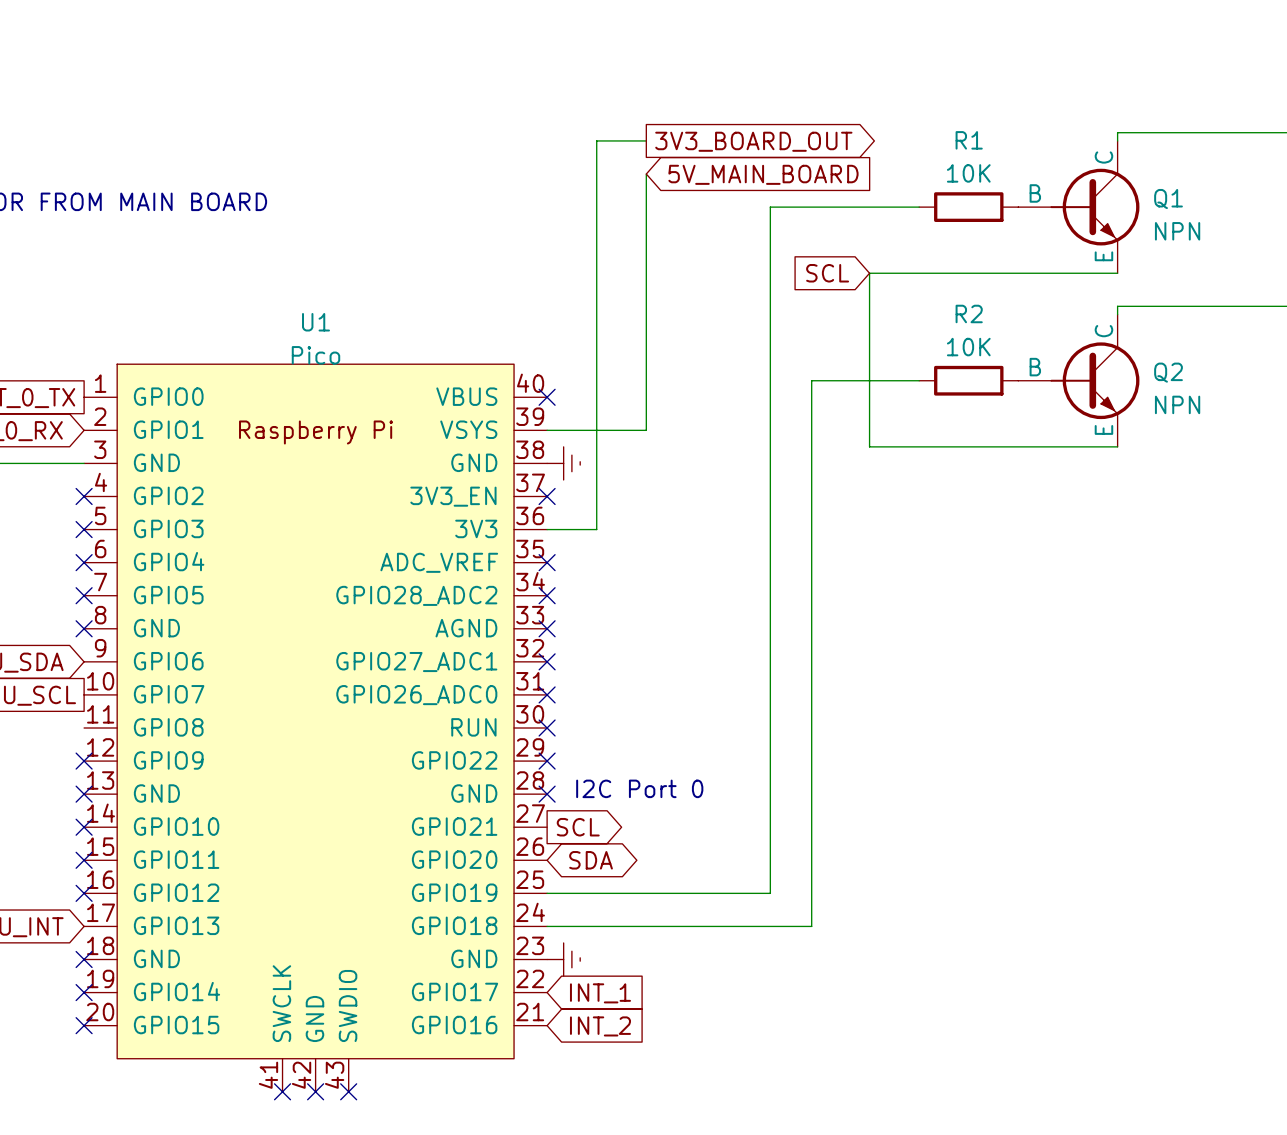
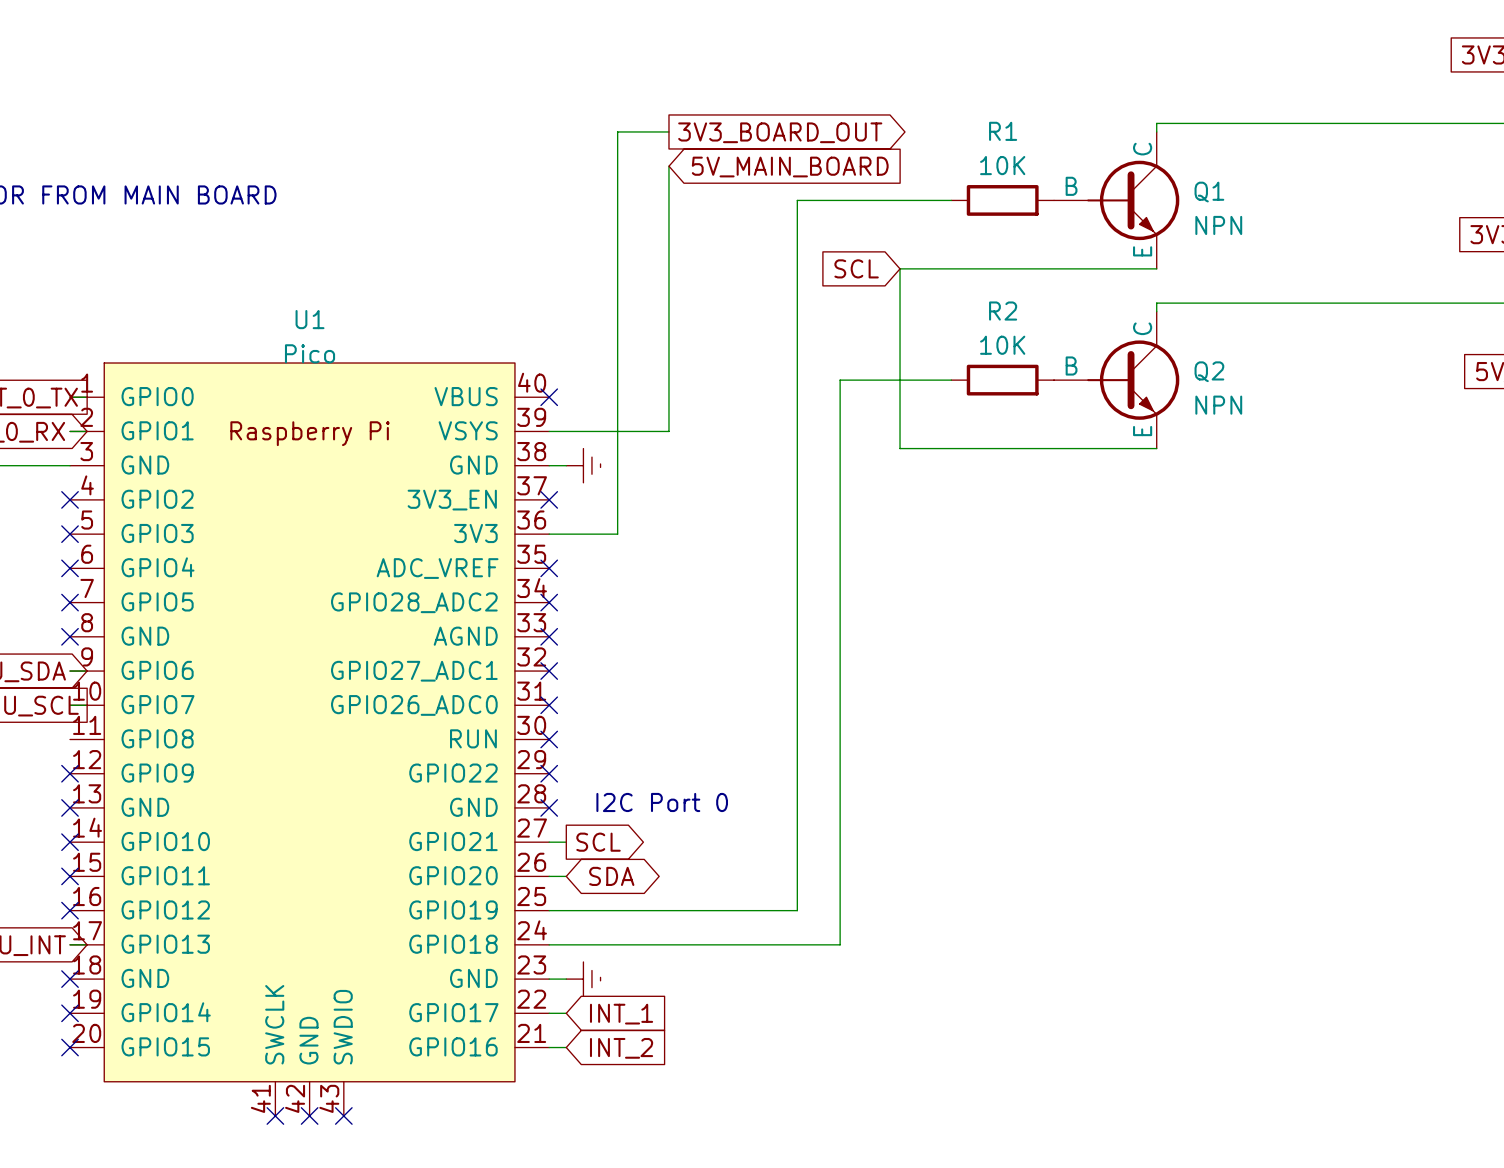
wire: none -> (70, 397) (87, 397)
no-connect mark position: (547, 397) -> (549, 397)
no-connect mark position: (84, 496) -> (70, 499)
no-connect mark position: (547, 496) -> (549, 499)
no-connect mark position: (84, 529) -> (70, 534)
no-connect mark position: (84, 562) -> (70, 568)
no-connect mark position: (547, 562) -> (549, 568)
no-connect mark position: (84, 595) -> (70, 602)
no-connect mark position: (547, 595) -> (549, 602)
no-connect mark position: (84, 628) -> (70, 636)
no-connect mark position: (547, 628) -> (549, 636)
wire: none -> (70, 671) (87, 671)
no-connect mark position: (547, 661) -> (549, 671)
wire: none -> (70, 705) (87, 705)
no-connect mark position: (547, 694) -> (549, 705)
U1 position: (315, 728) -> (309, 739)
no-connect mark position: (547, 728) -> (549, 739)
no-connect mark position: (84, 761) -> (70, 773)
no-connect mark position: (547, 761) -> (549, 773)
no-connect mark position: (84, 794) -> (70, 807)
no-connect mark position: (547, 794) -> (549, 807)
no-connect mark position: (84, 827) -> (70, 842)
no-connect mark position: (84, 860) -> (70, 876)
no-connect mark position: (84, 893) -> (70, 910)
wire: none -> (70, 944) (87, 944)
no-connect mark position: (84, 959) -> (70, 979)
no-connect mark position: (84, 992) -> (70, 1013)
no-connect mark position: (84, 1025) -> (70, 1047)
no-connect mark: none -> (275, 1115)
no-connect mark: (282, 1091) -> none
no-connect mark: none -> (309, 1115)
no-connect mark: (315, 1091) -> none
no-connect mark: none -> (343, 1115)
no-connect mark: (348, 1091) -> none

